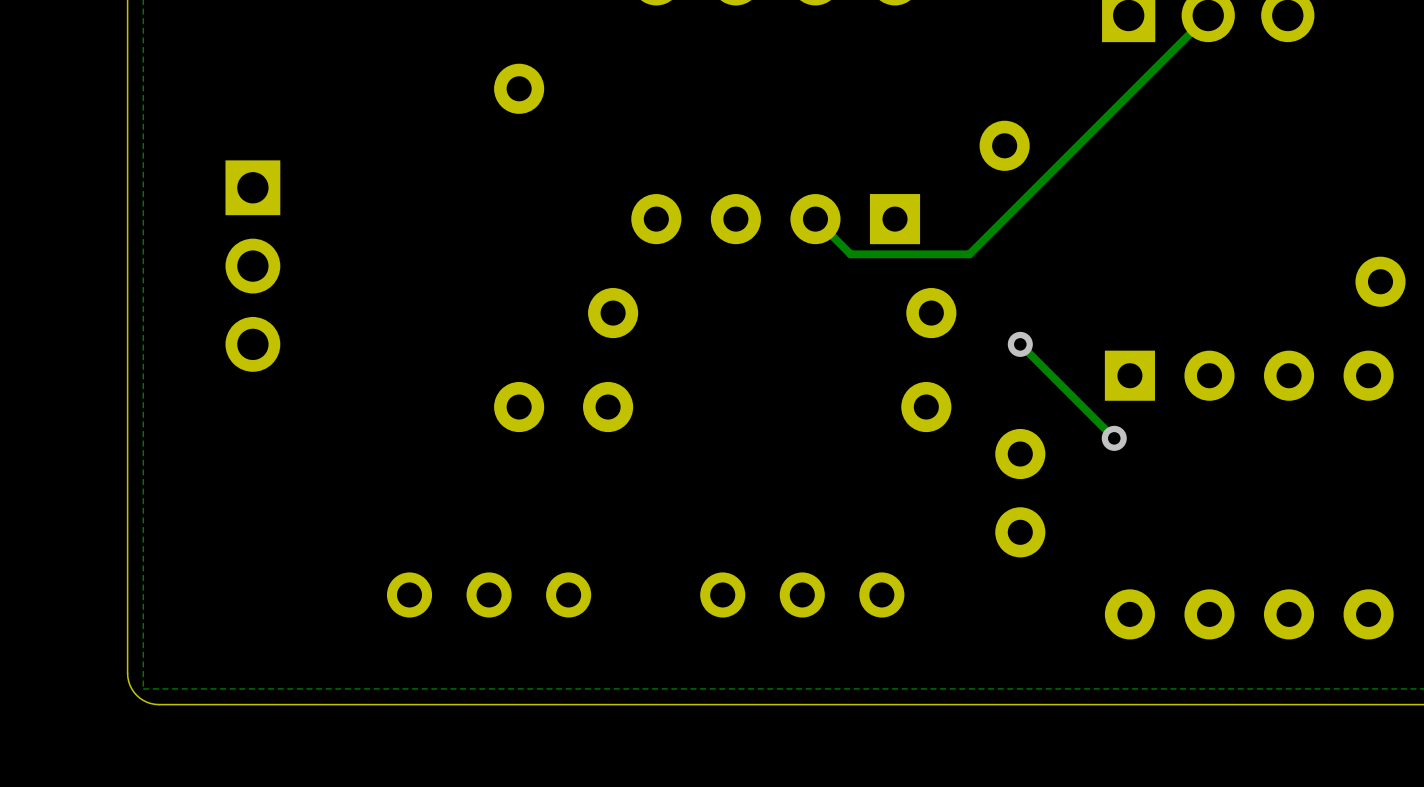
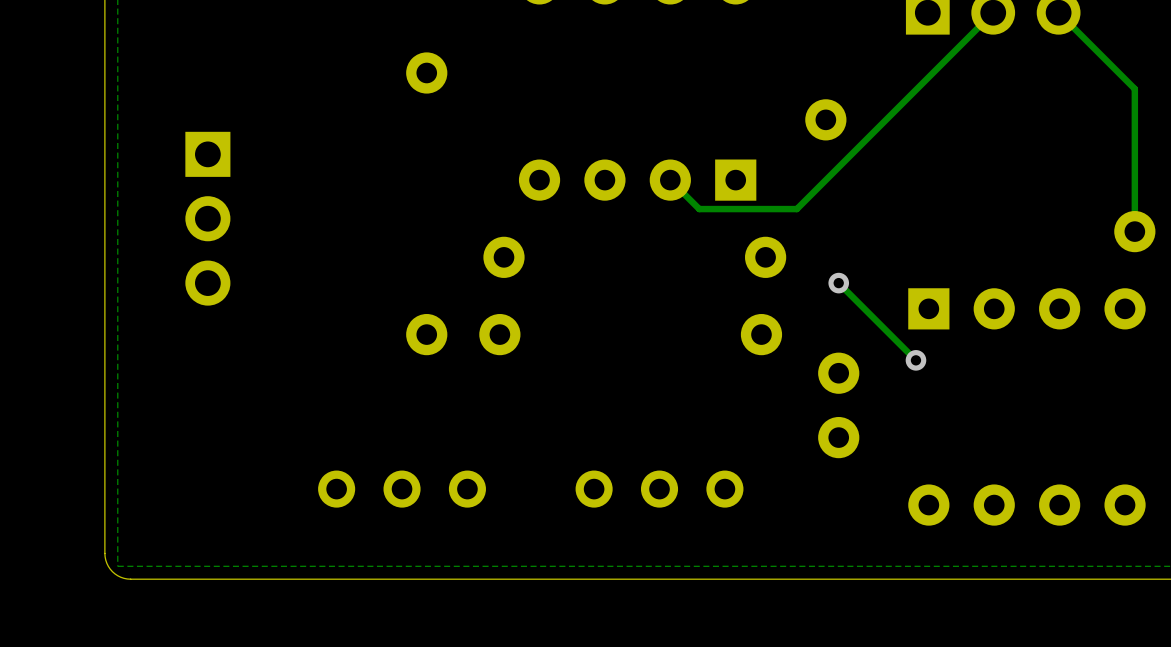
track: none -> (1058, 12) (1134, 88) (1134, 231)

